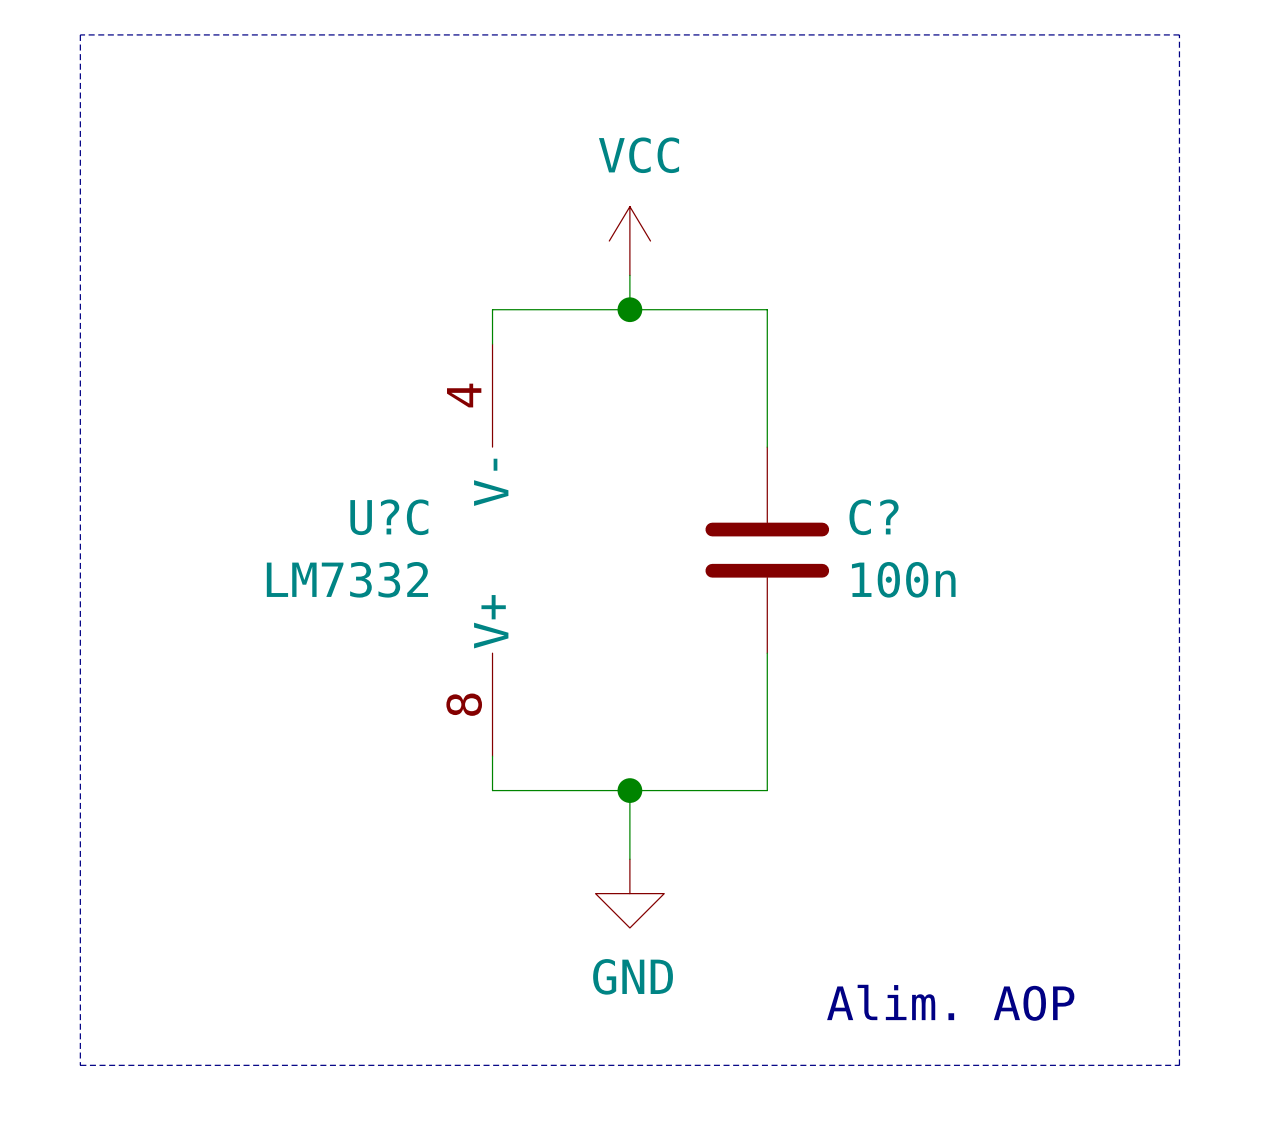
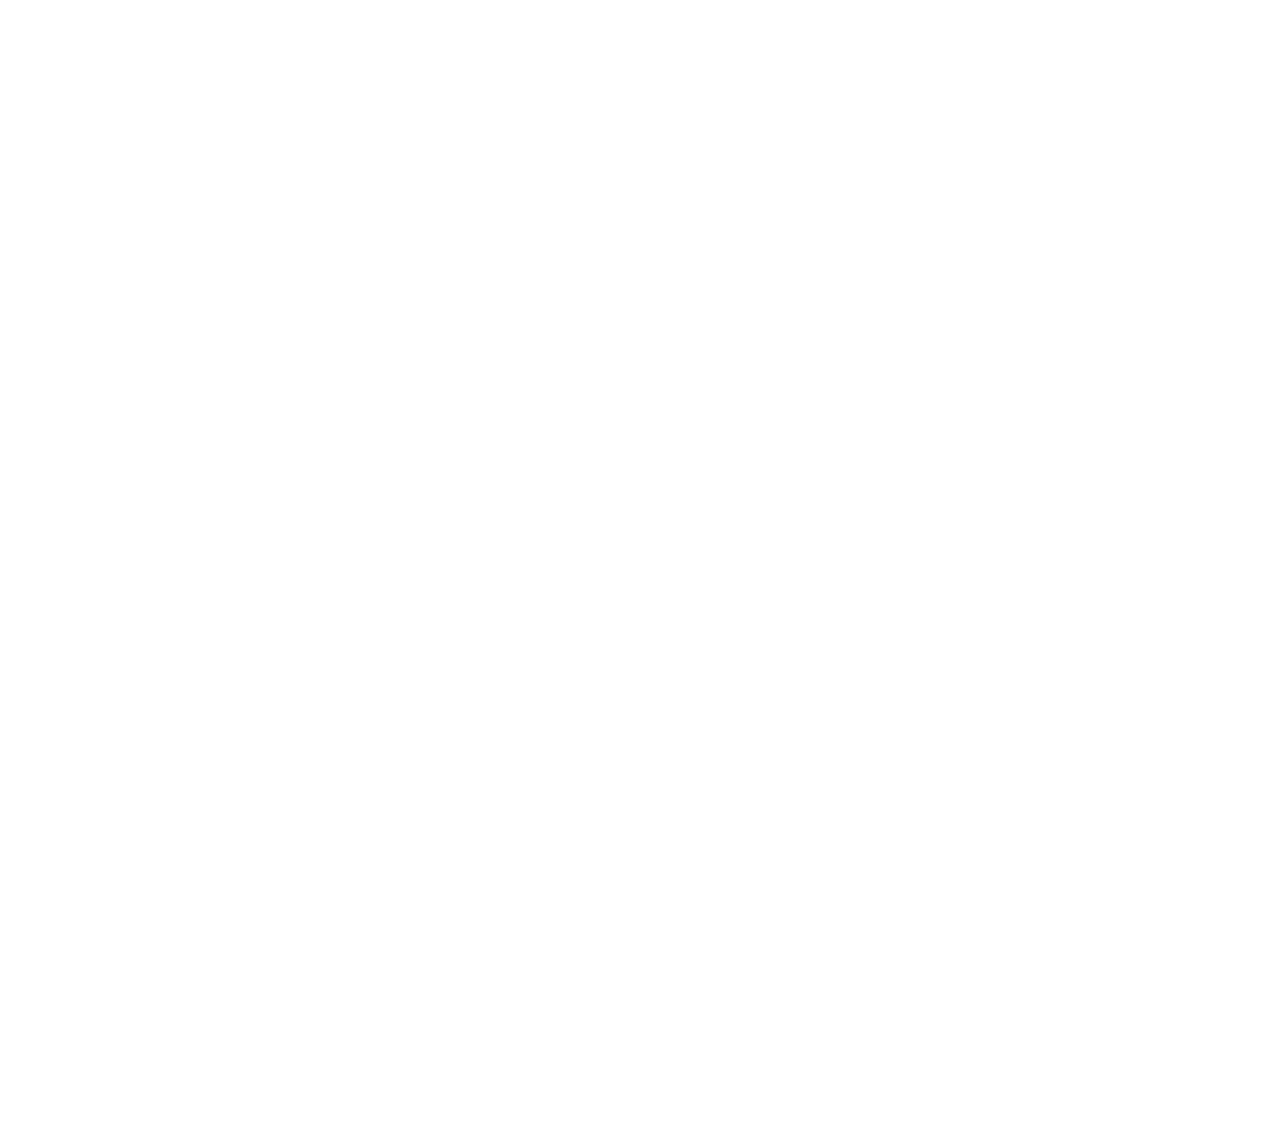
line: (80, 34) (80, 1065) (1179, 1065) (1179, 34) (80, 34) -> none
power symbol: VCC (629, 241) -> none
wire: (629, 275) (629, 309) -> none
junction: (629, 309) -> none
wire: (492, 344) (492, 309) (767, 309) (767, 447) -> none
U?C: LM7332 (492, 550) -> none
C?: 100n (767, 550) -> none
wire: (767, 653) (767, 790) (492, 790) (492, 756) -> none
wire: (629, 790) (629, 859) -> none
junction: (629, 790) -> none
power symbol: GND (629, 893) -> none
text: Alim. AOP (950, 1002) -> none

